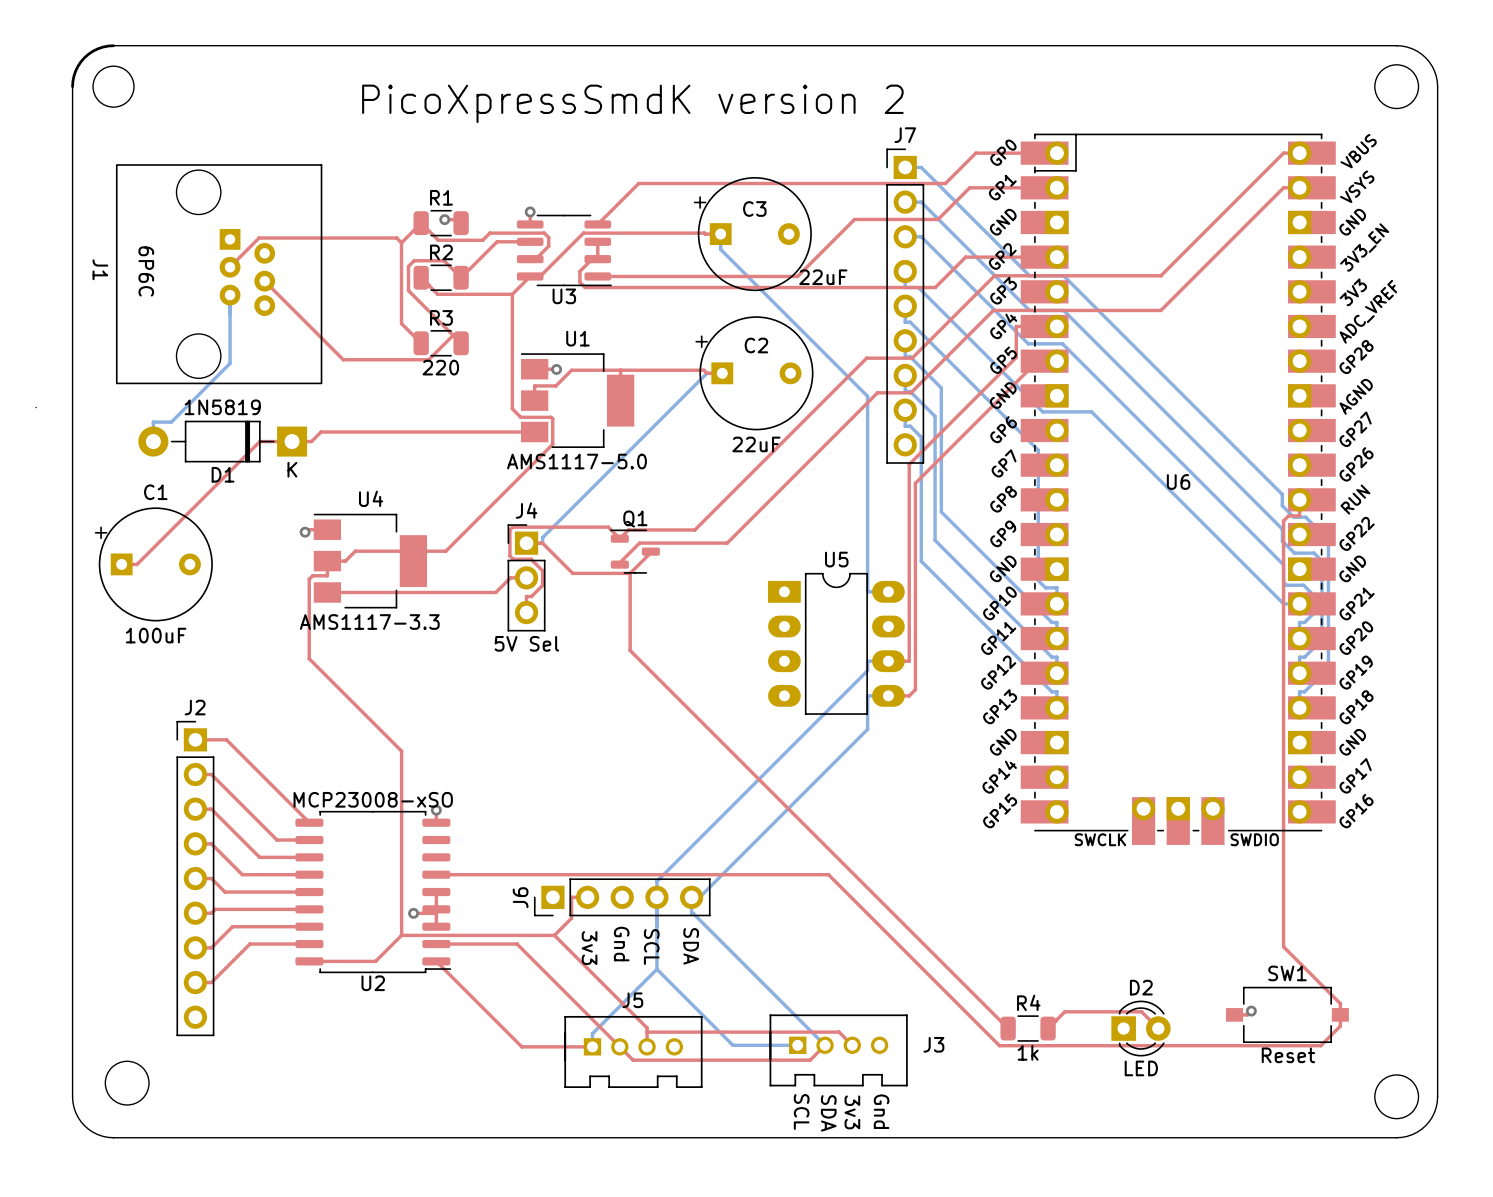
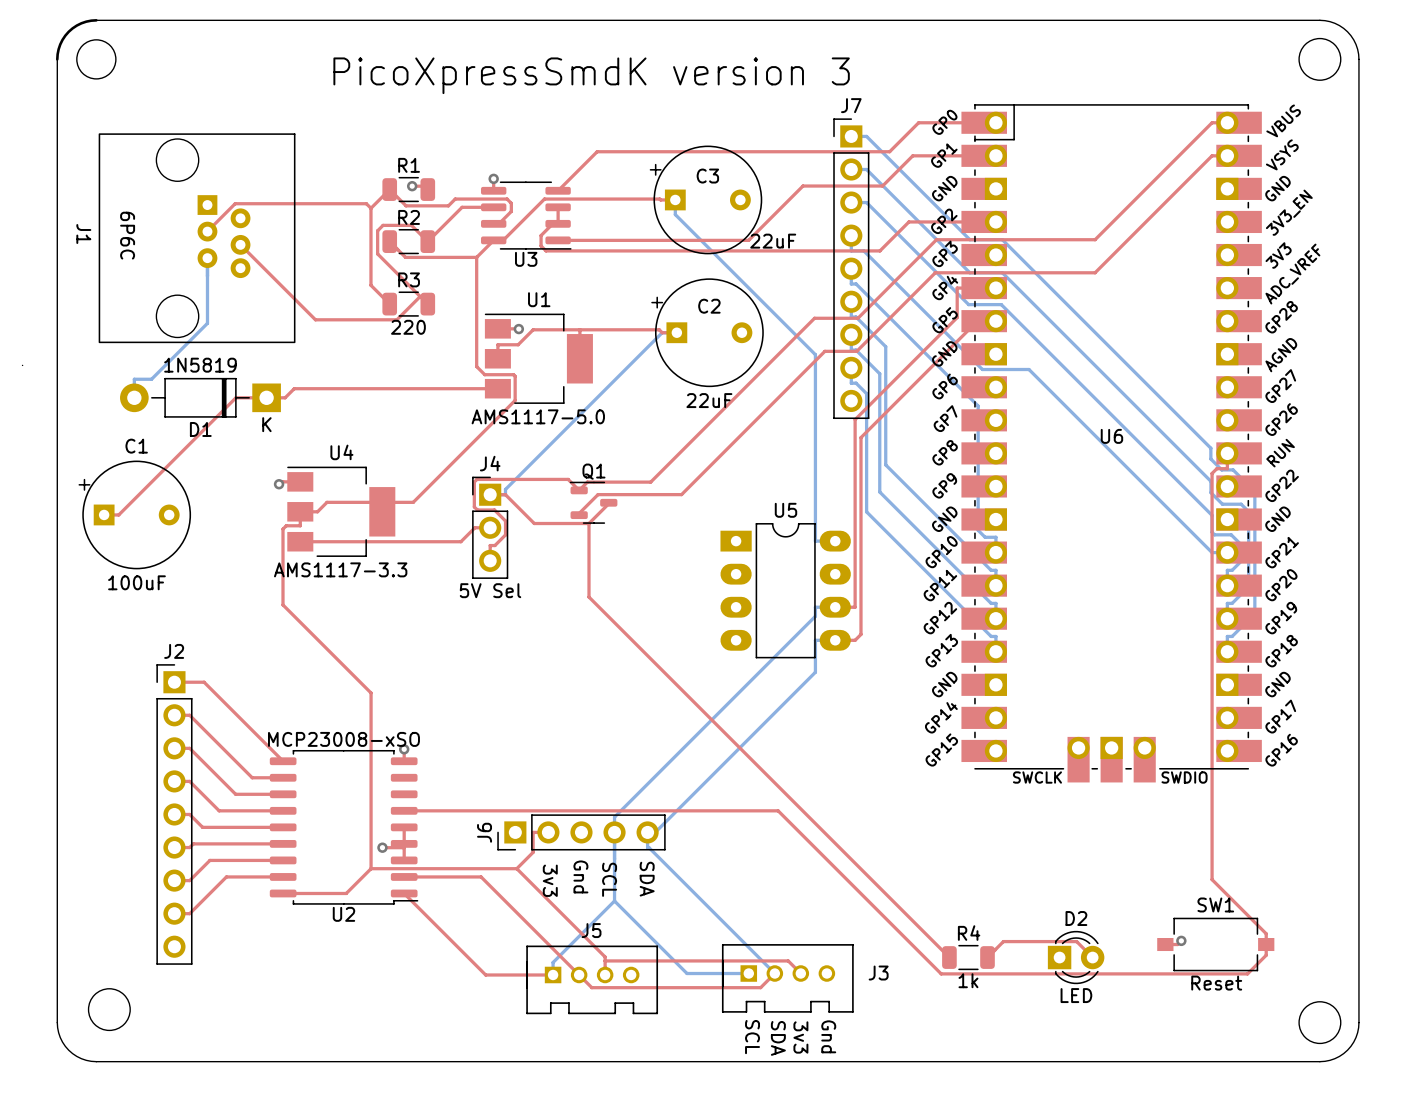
text: PicoXpressSmdK version 2 (632, 103) -> PicoXpressSmdK version 3 (591, 75)

